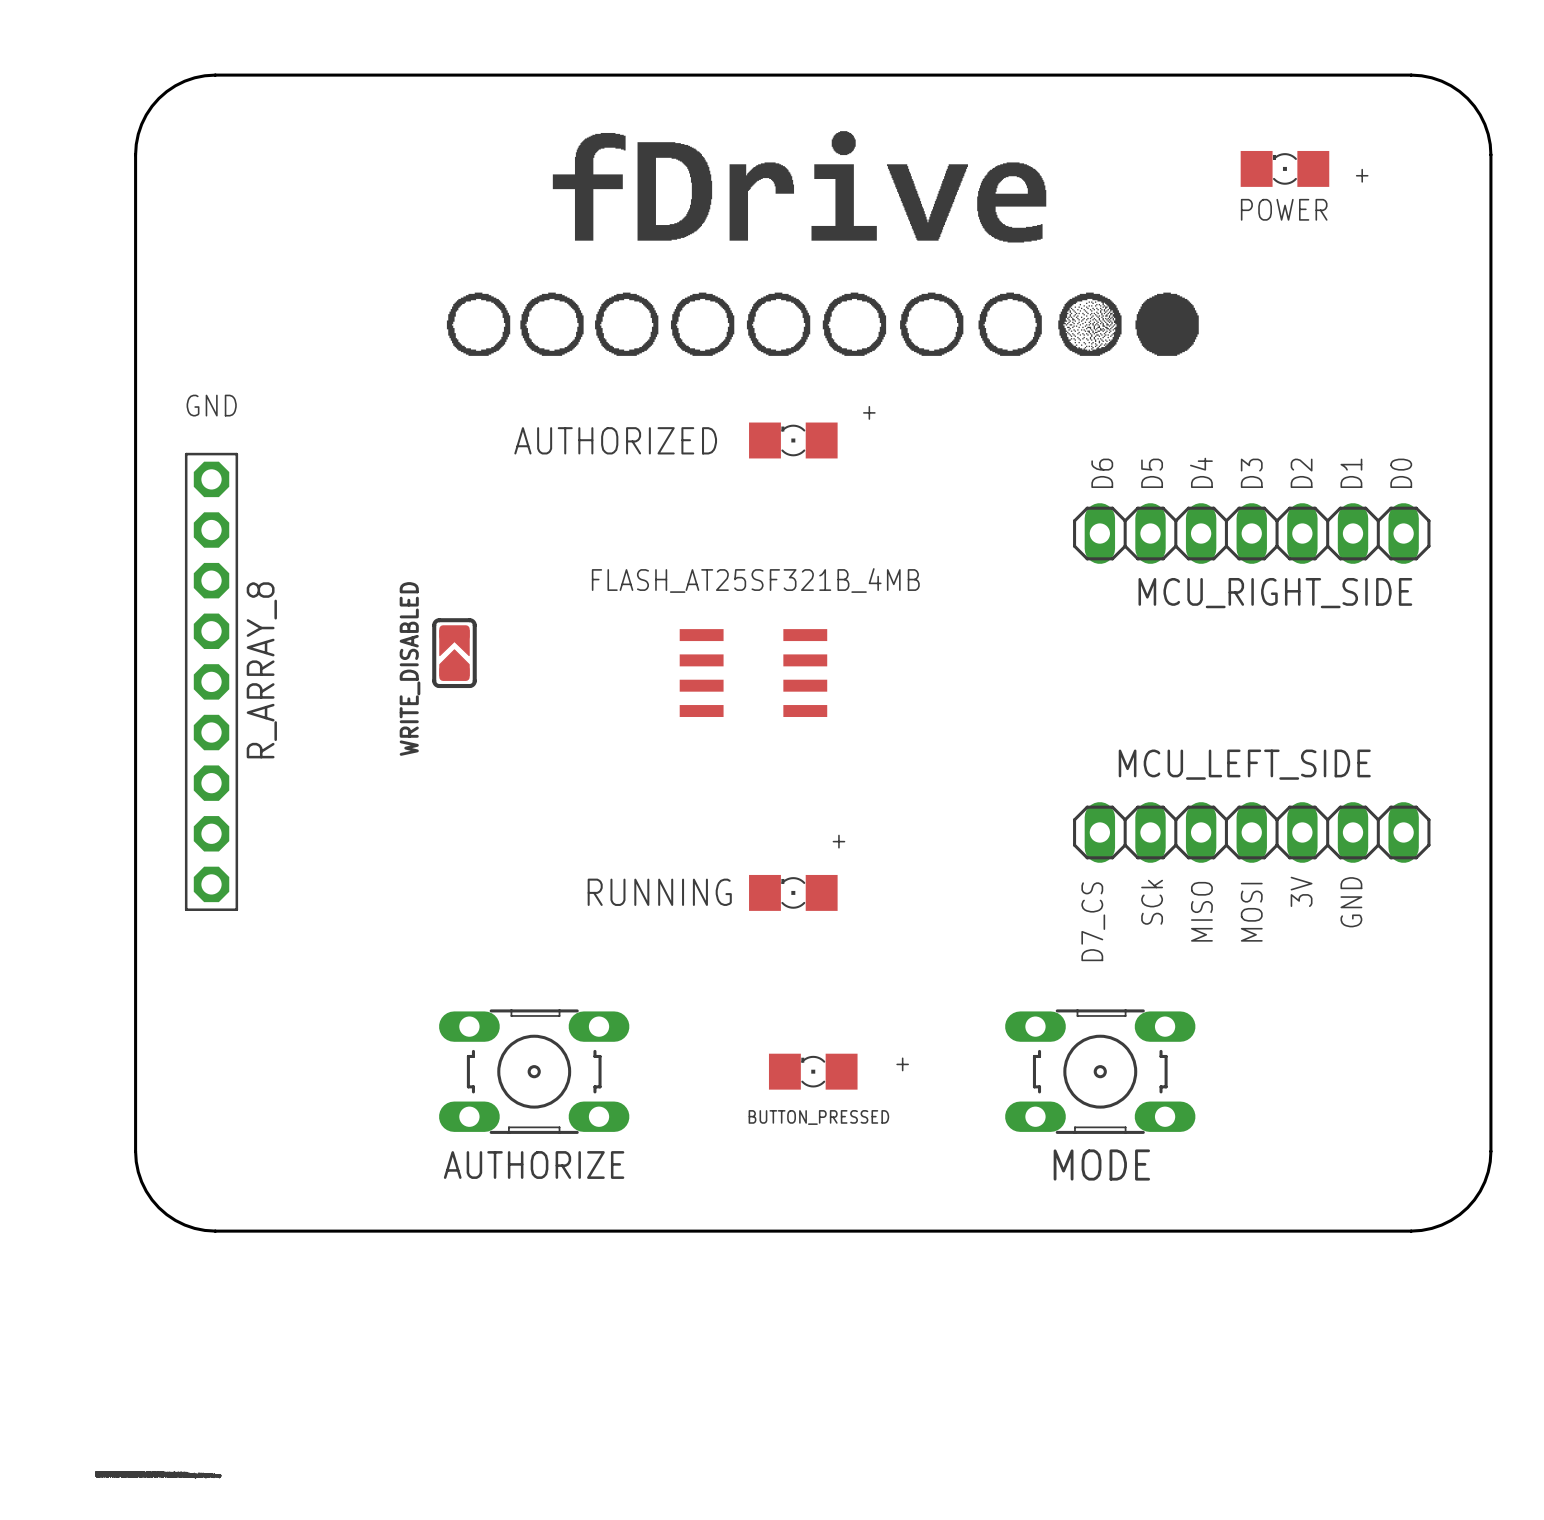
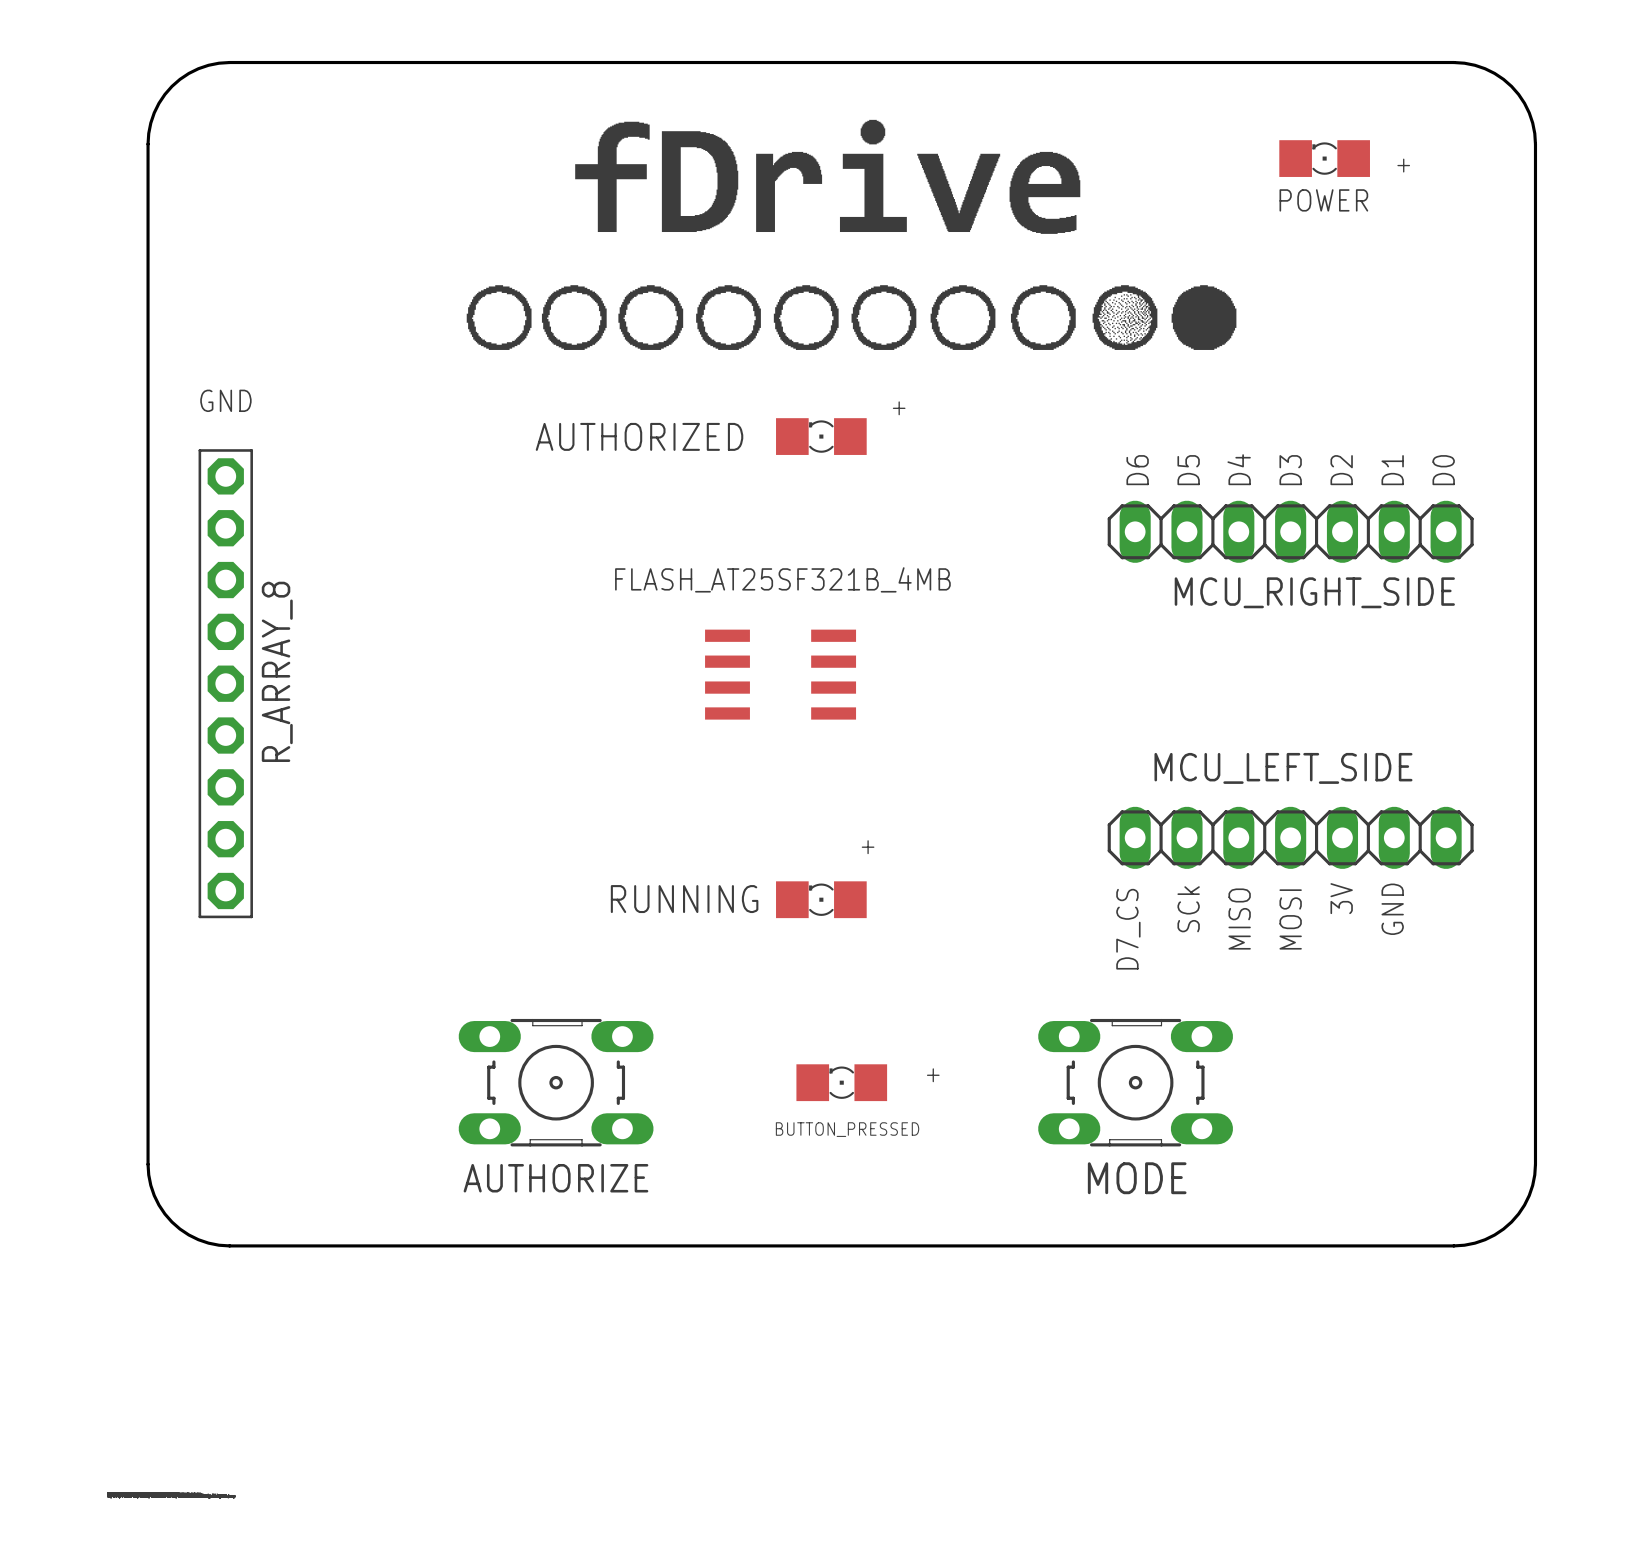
WRITE_DISABLED: (454, 653) -> none

